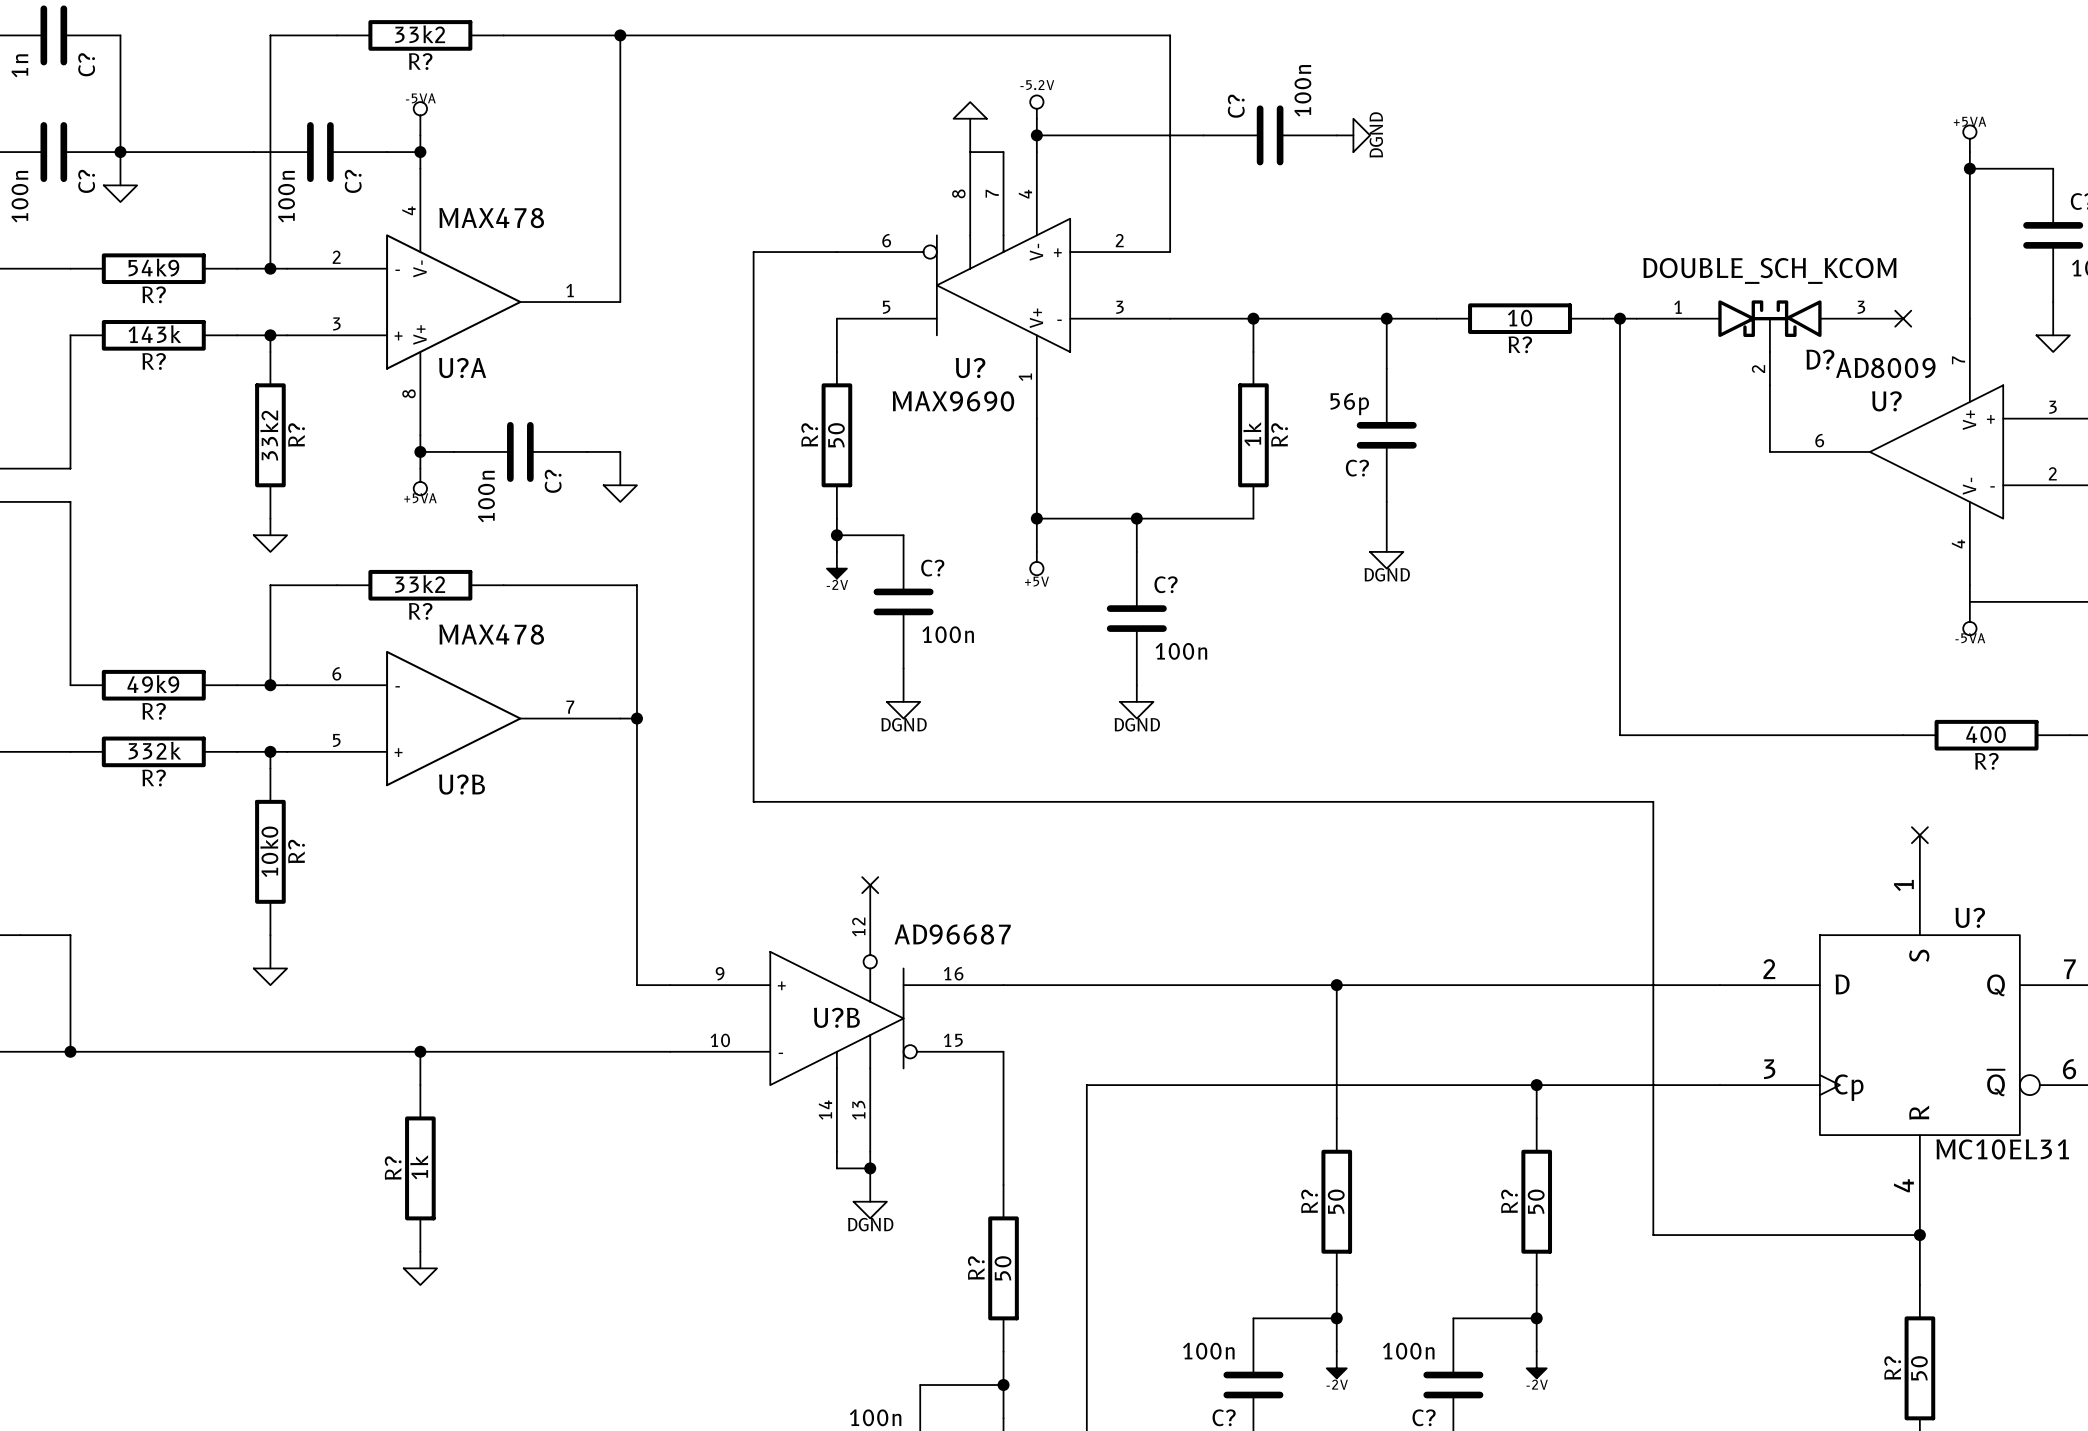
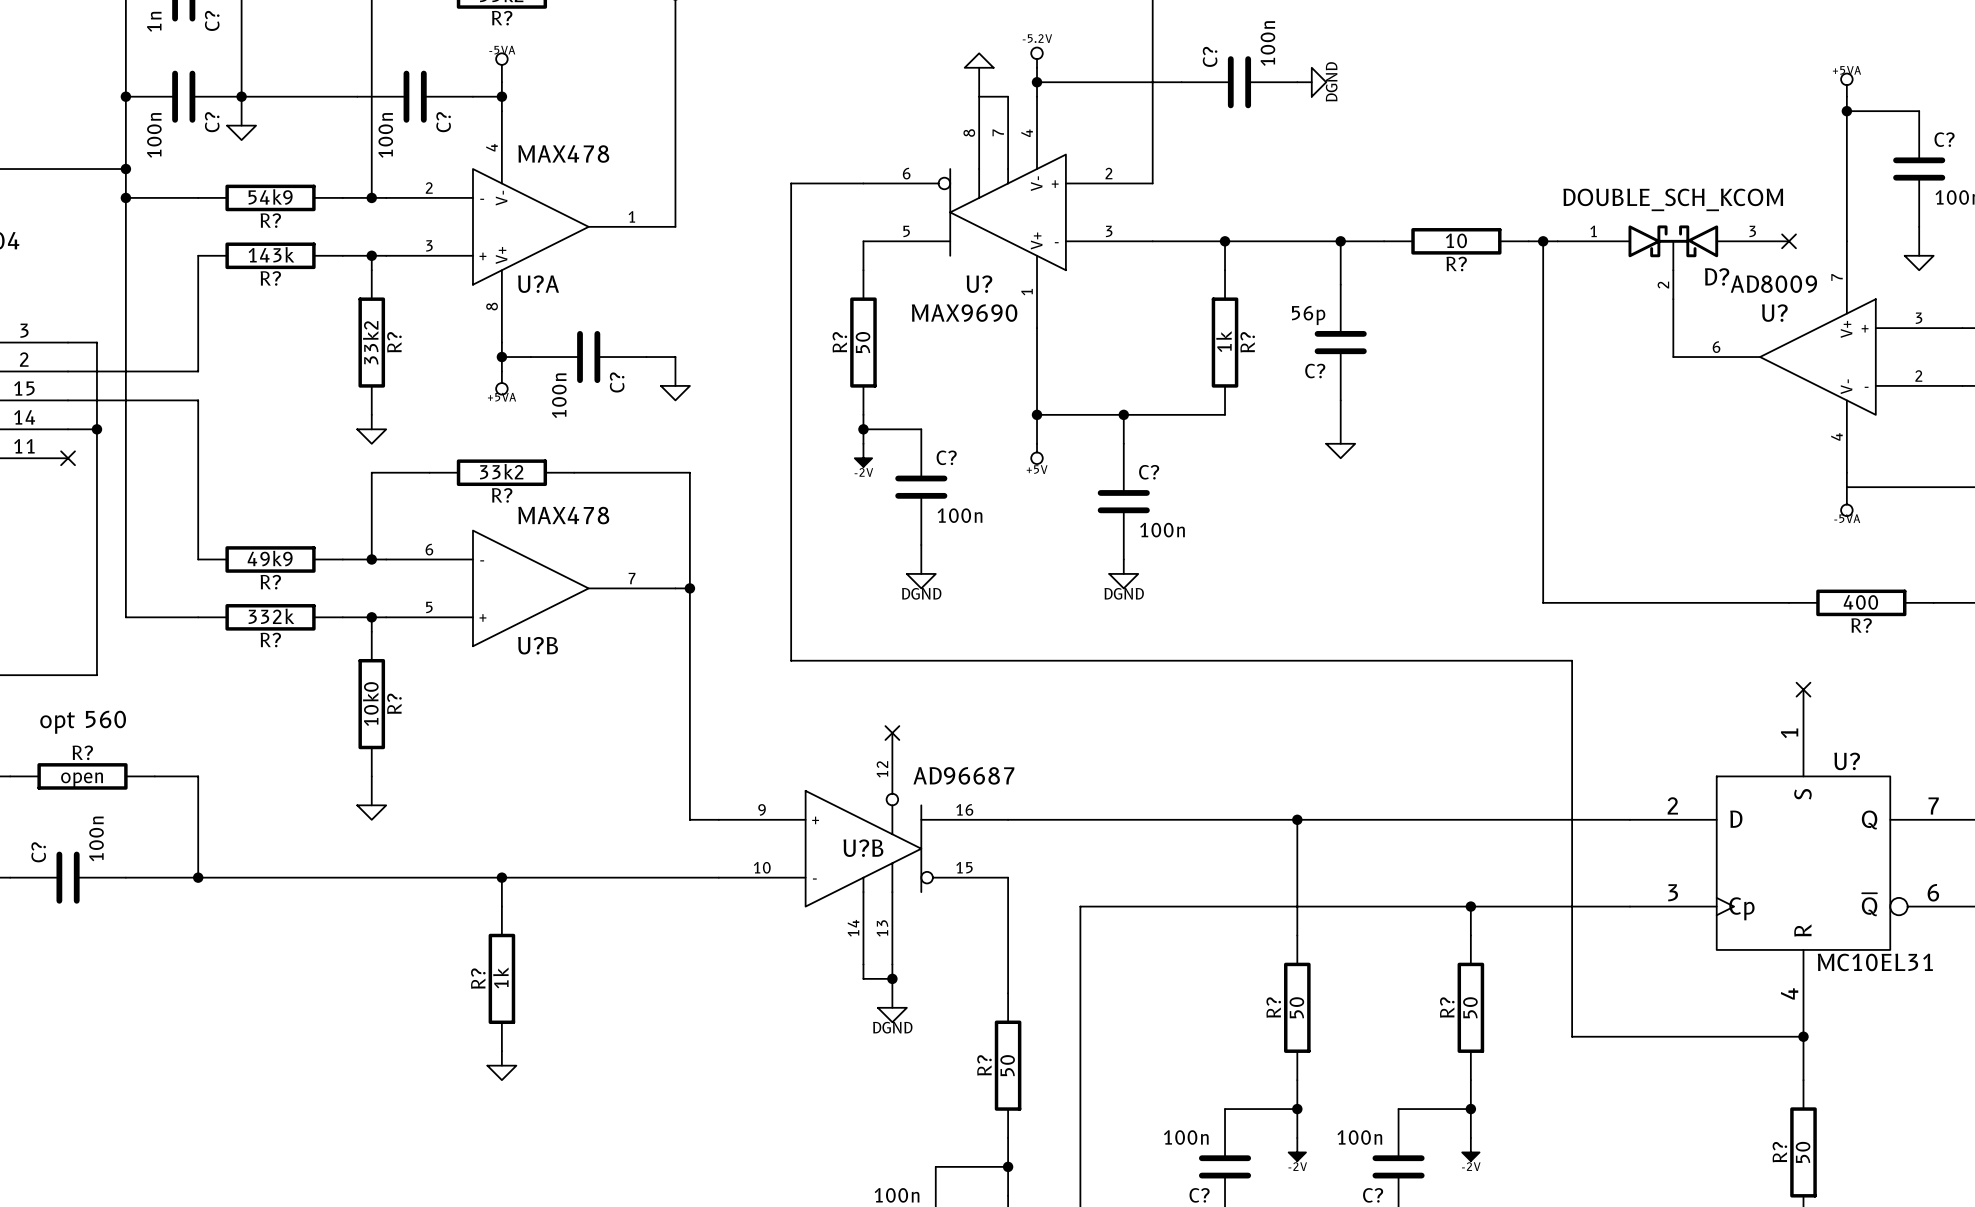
power symbol text: DGND (1387, 574) -> none

